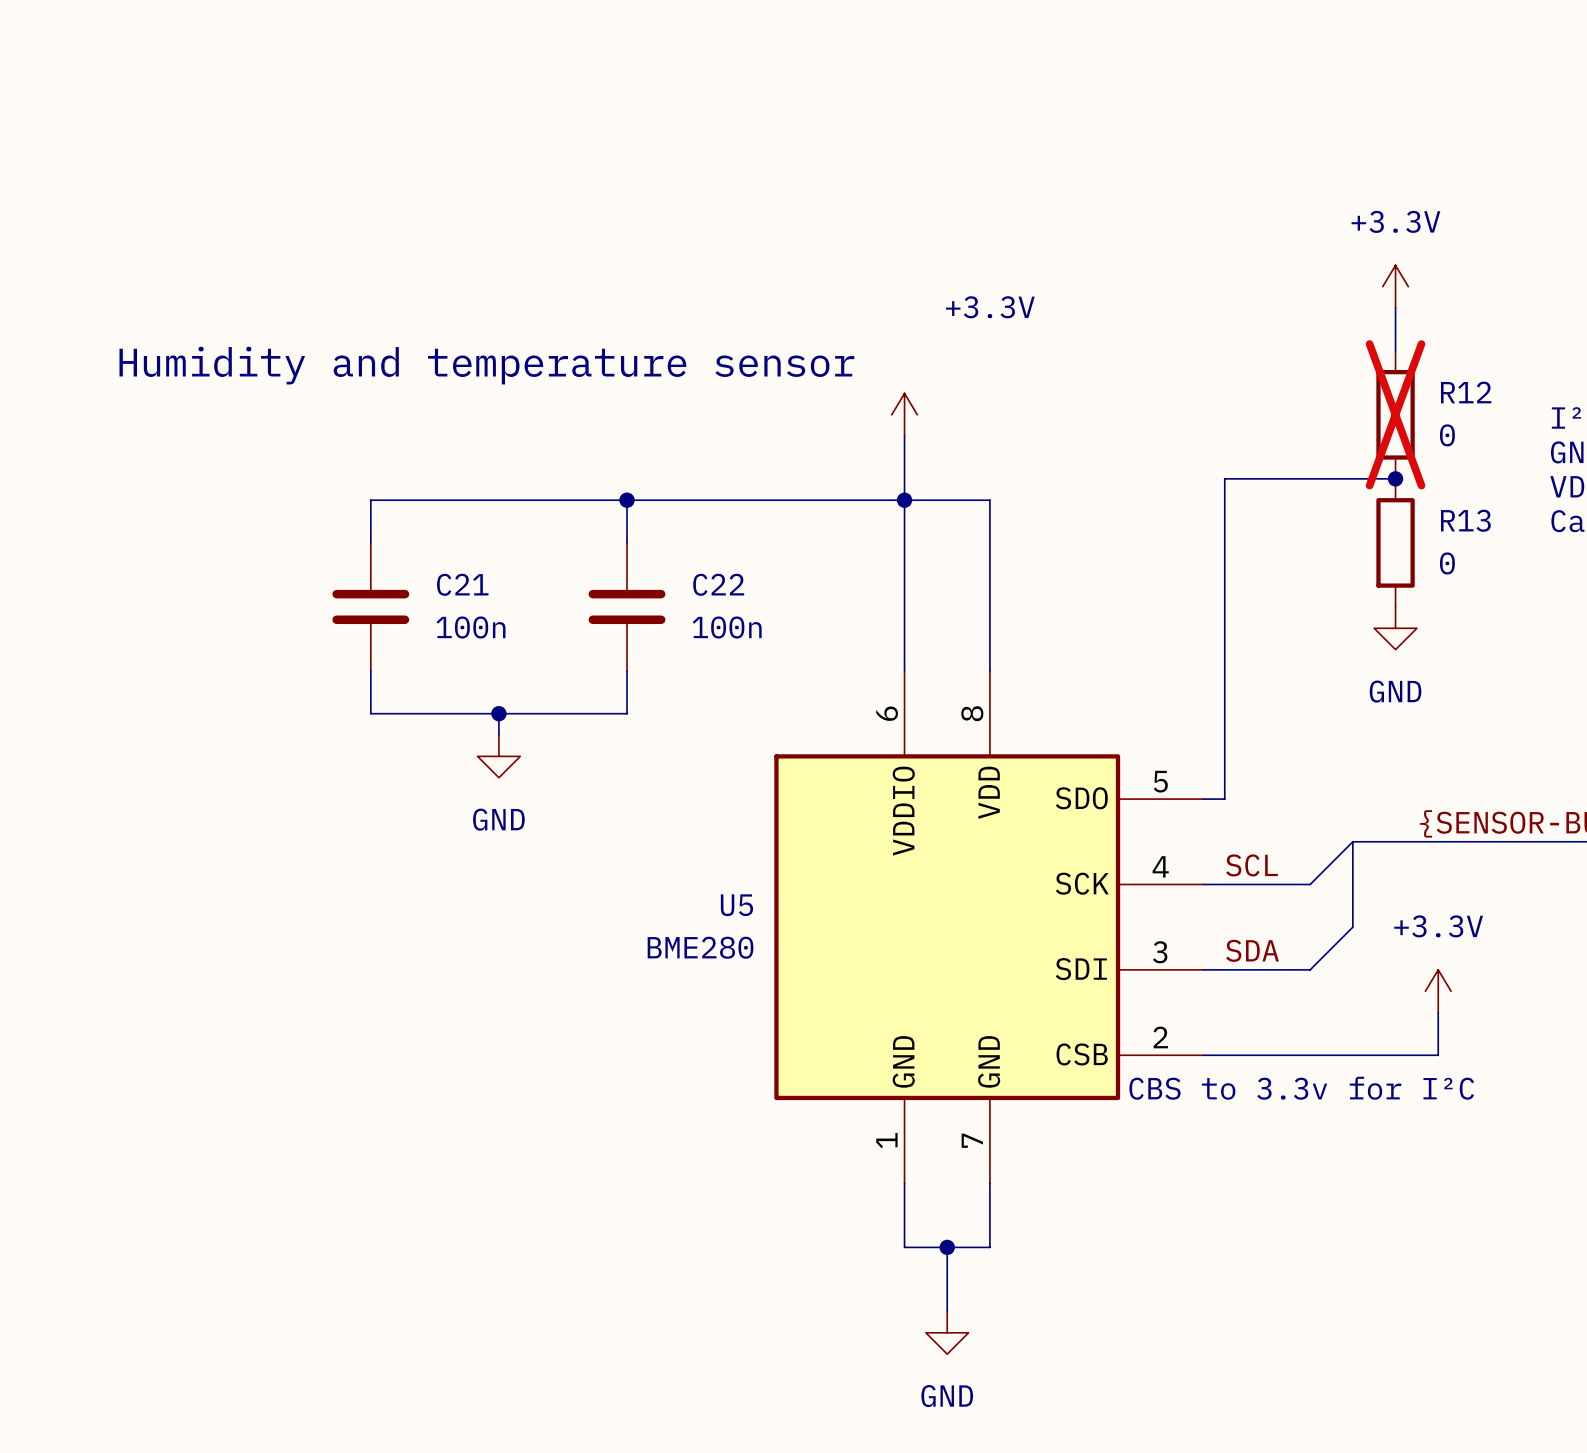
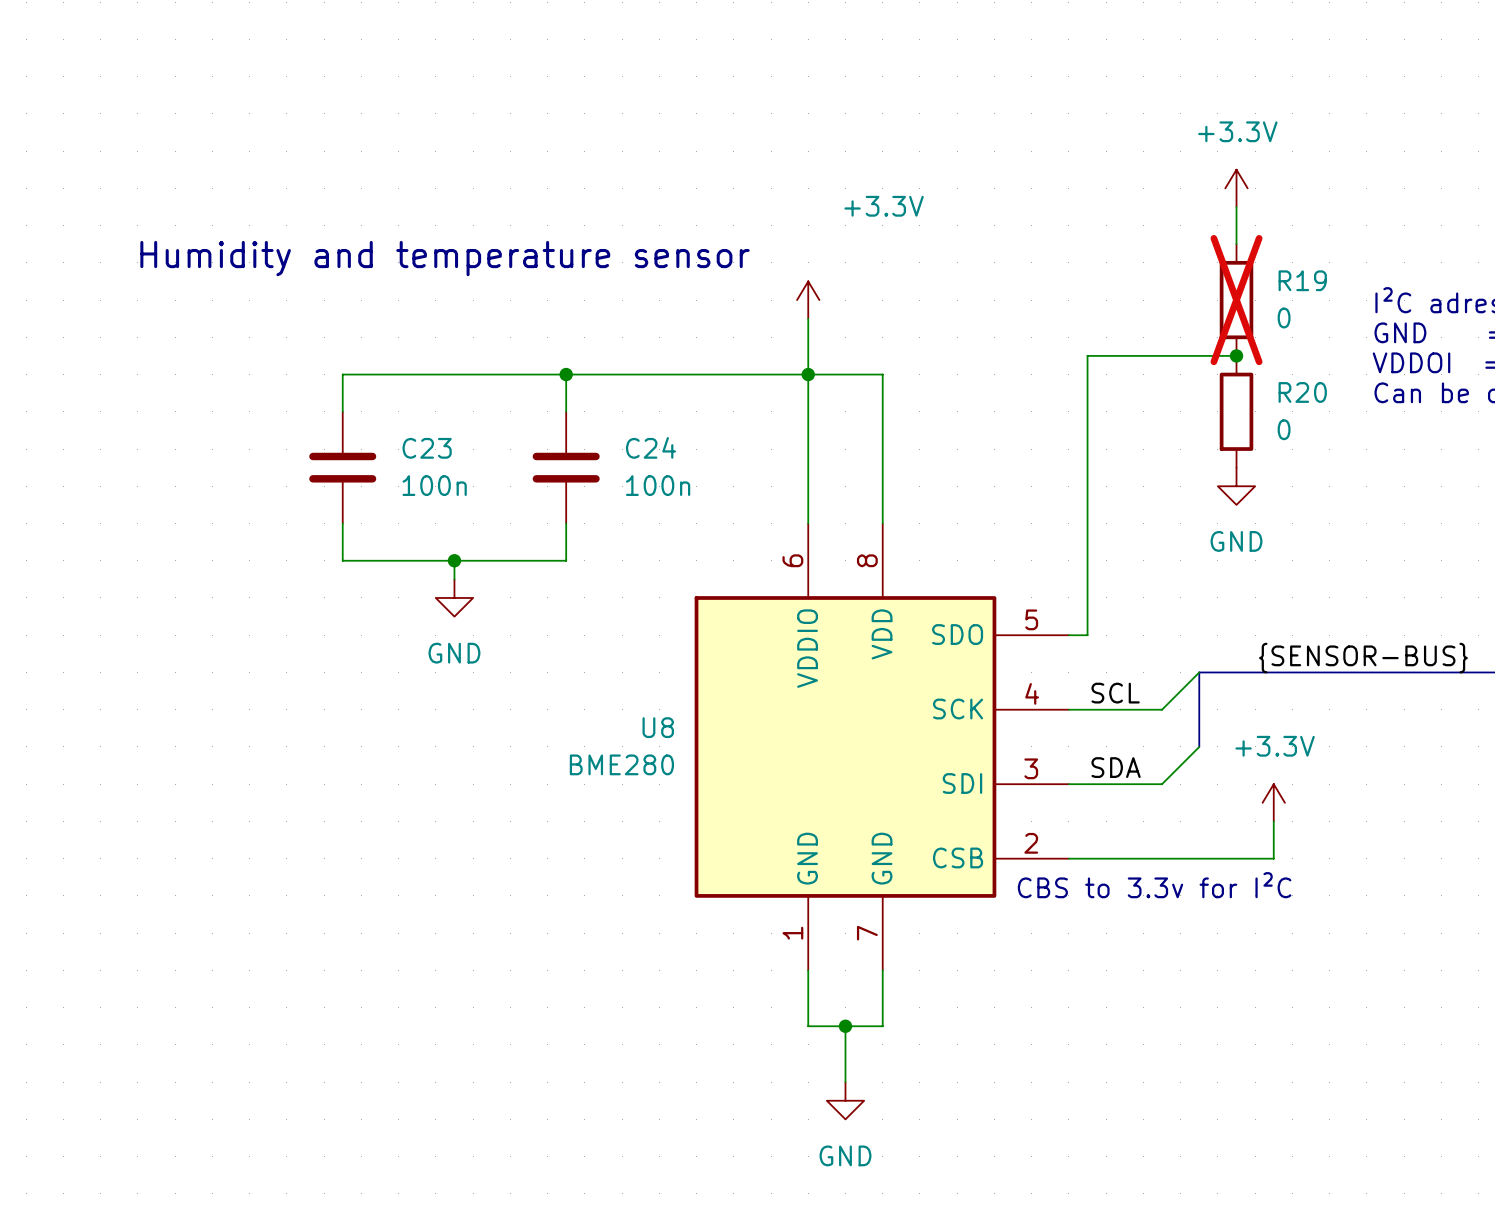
R12 name: R12 (1466, 392) -> R19 (1302, 280)
R13 name: R13 (1465, 520) -> R20 (1302, 392)
C21 name: C21 (462, 584) -> C23 (427, 448)
C22 name: C22 (718, 584) -> C24 (651, 447)
U5 name: U5 (736, 905) -> U8 (658, 727)

